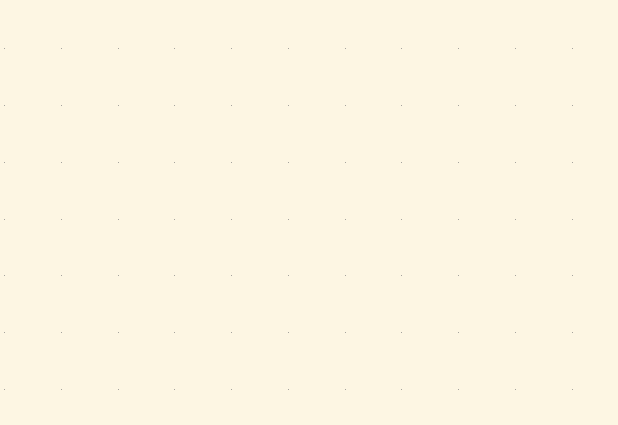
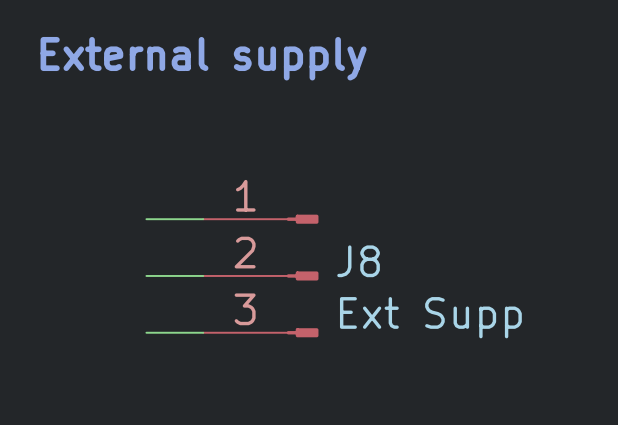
text: none -> External supply (203, 58)
wire: none -> (146, 219) (203, 219)
wire: none -> (146, 275) (203, 275)
J8: none -> Ext Supp (260, 275)
wire: none -> (146, 332) (203, 332)

